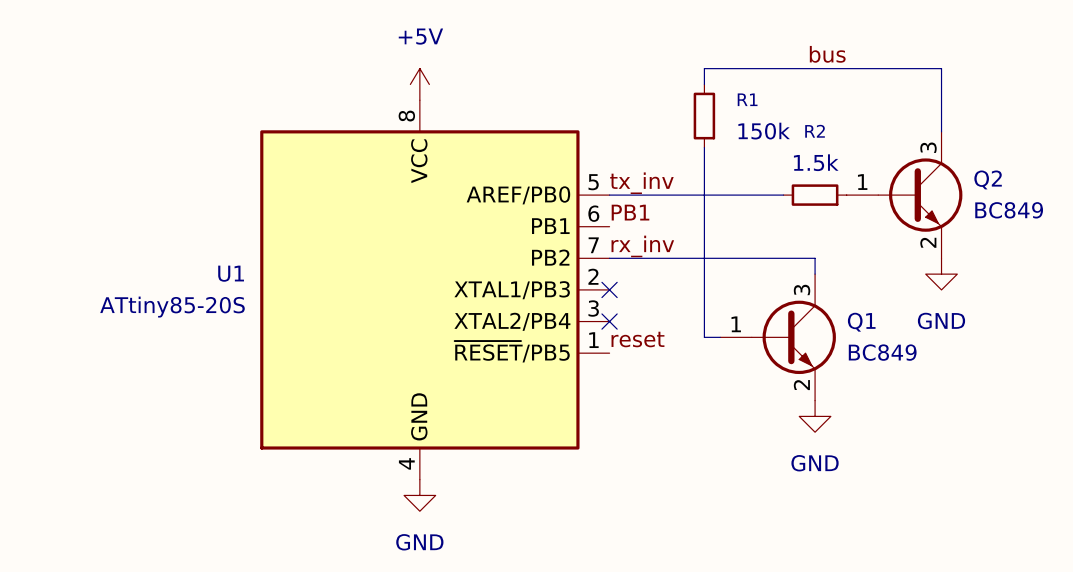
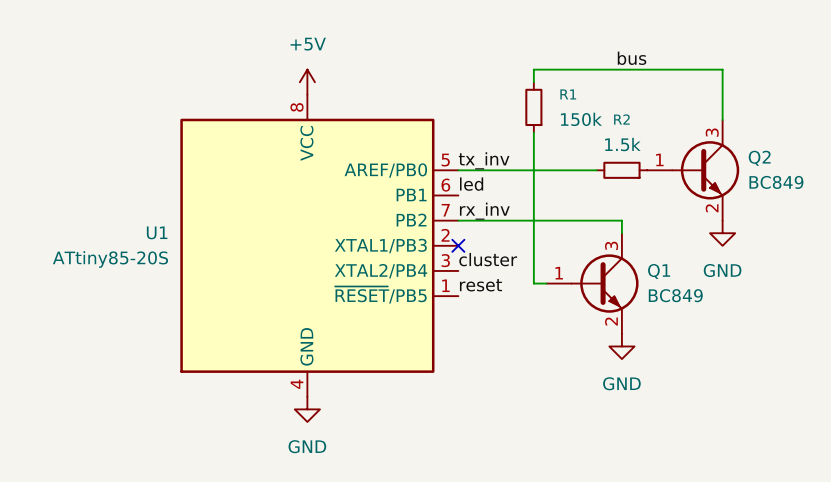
label: PB1 (630, 212) -> led (471, 184)
label: none -> cluster (488, 259)
no-connect mark: (609, 321) -> none

